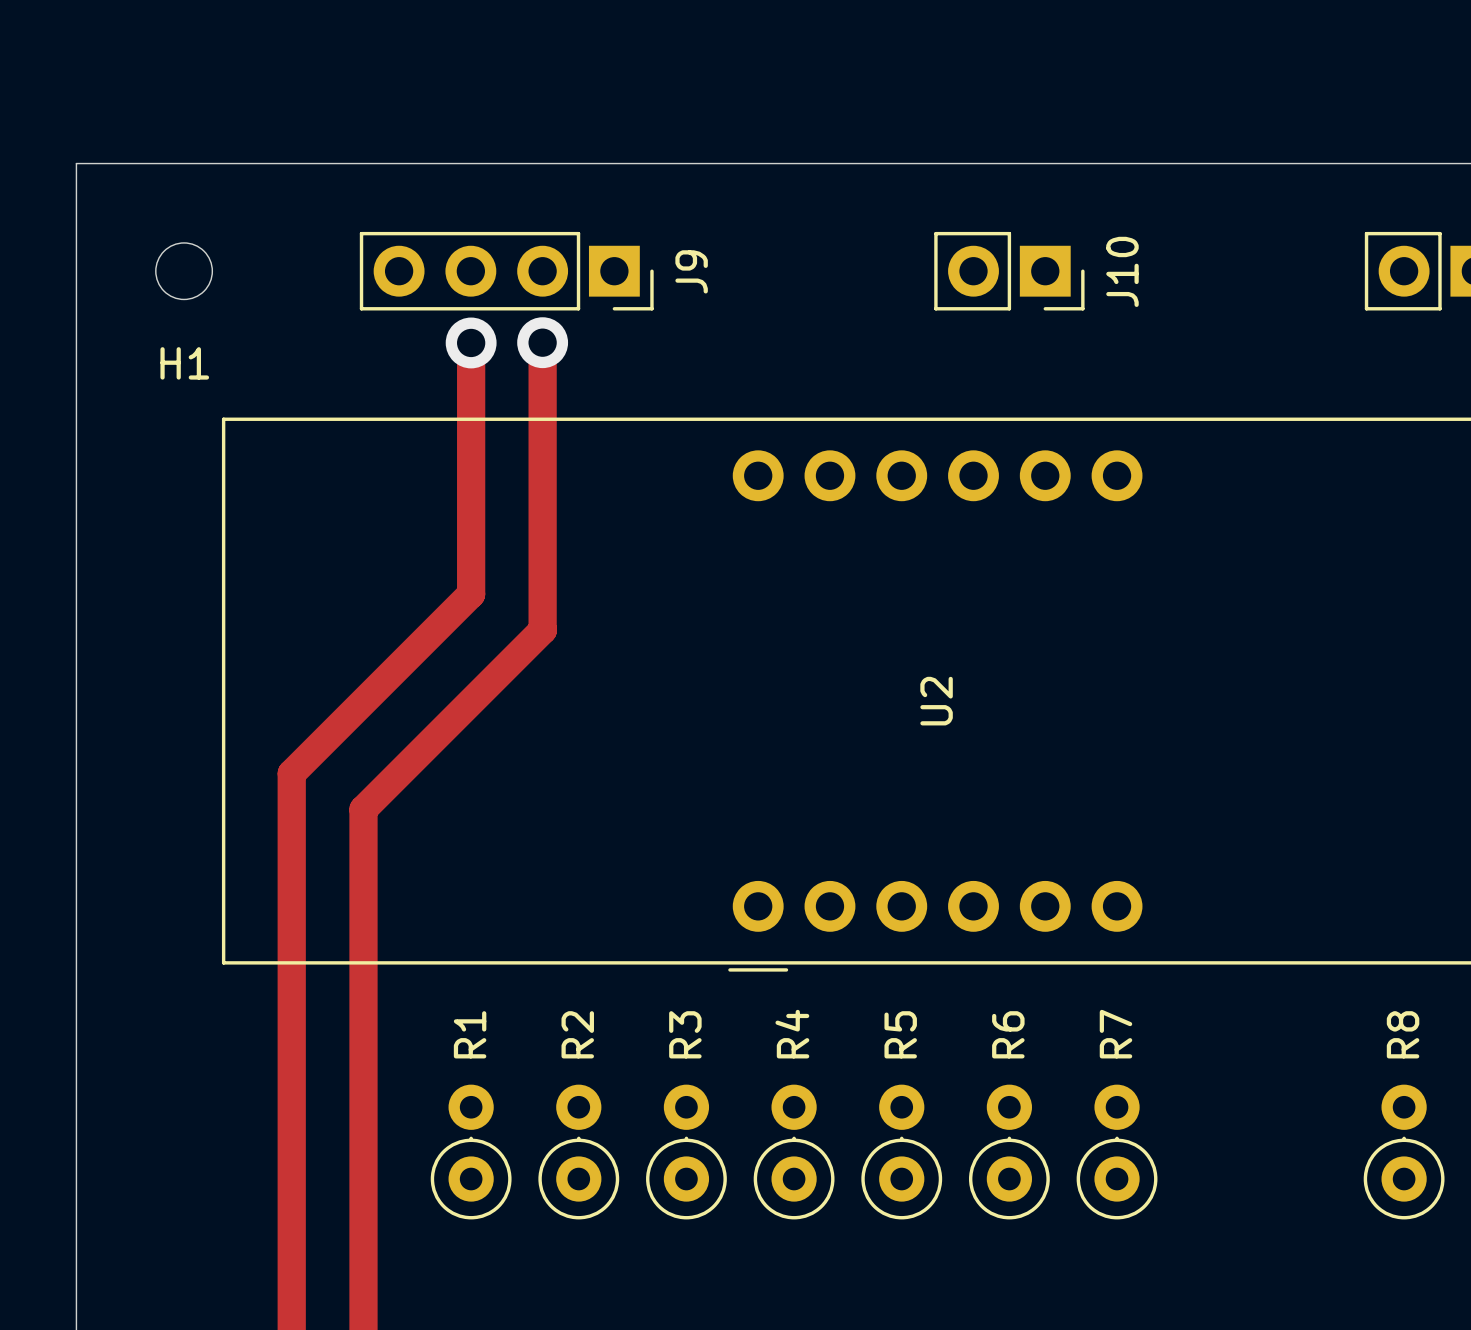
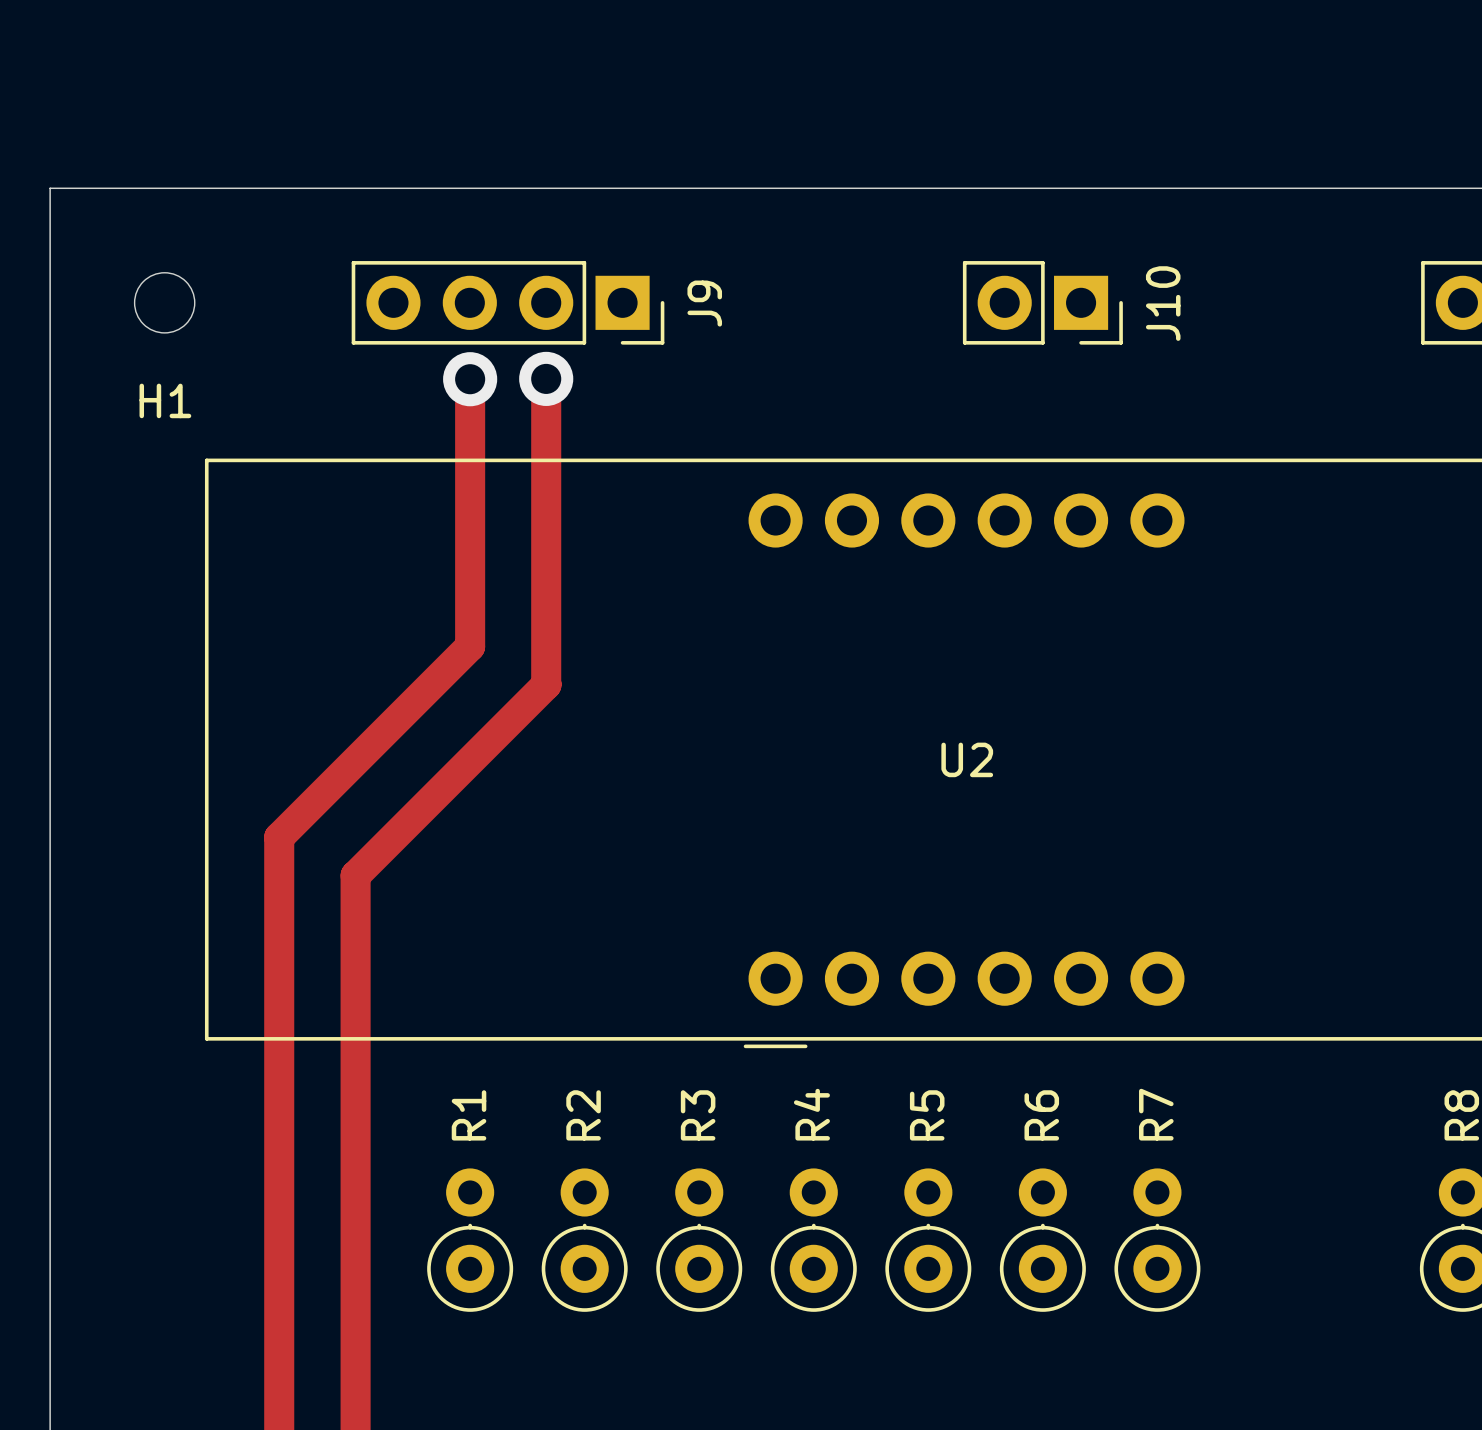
U2 name rotation: 0° (936, 701) -> 90° clockwise (967, 759)

